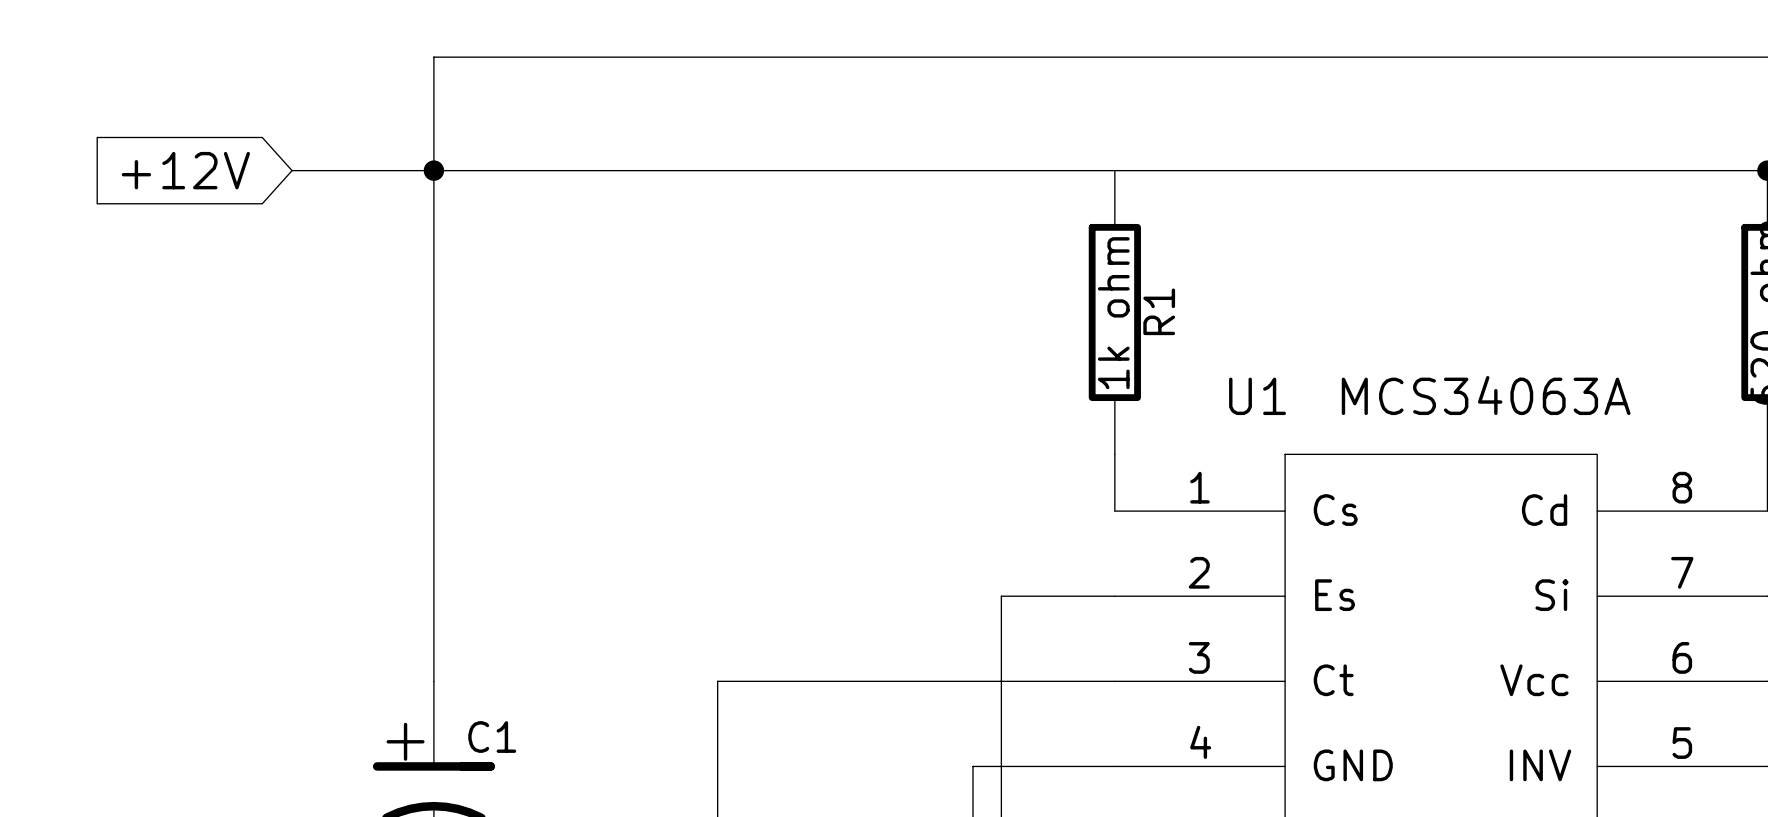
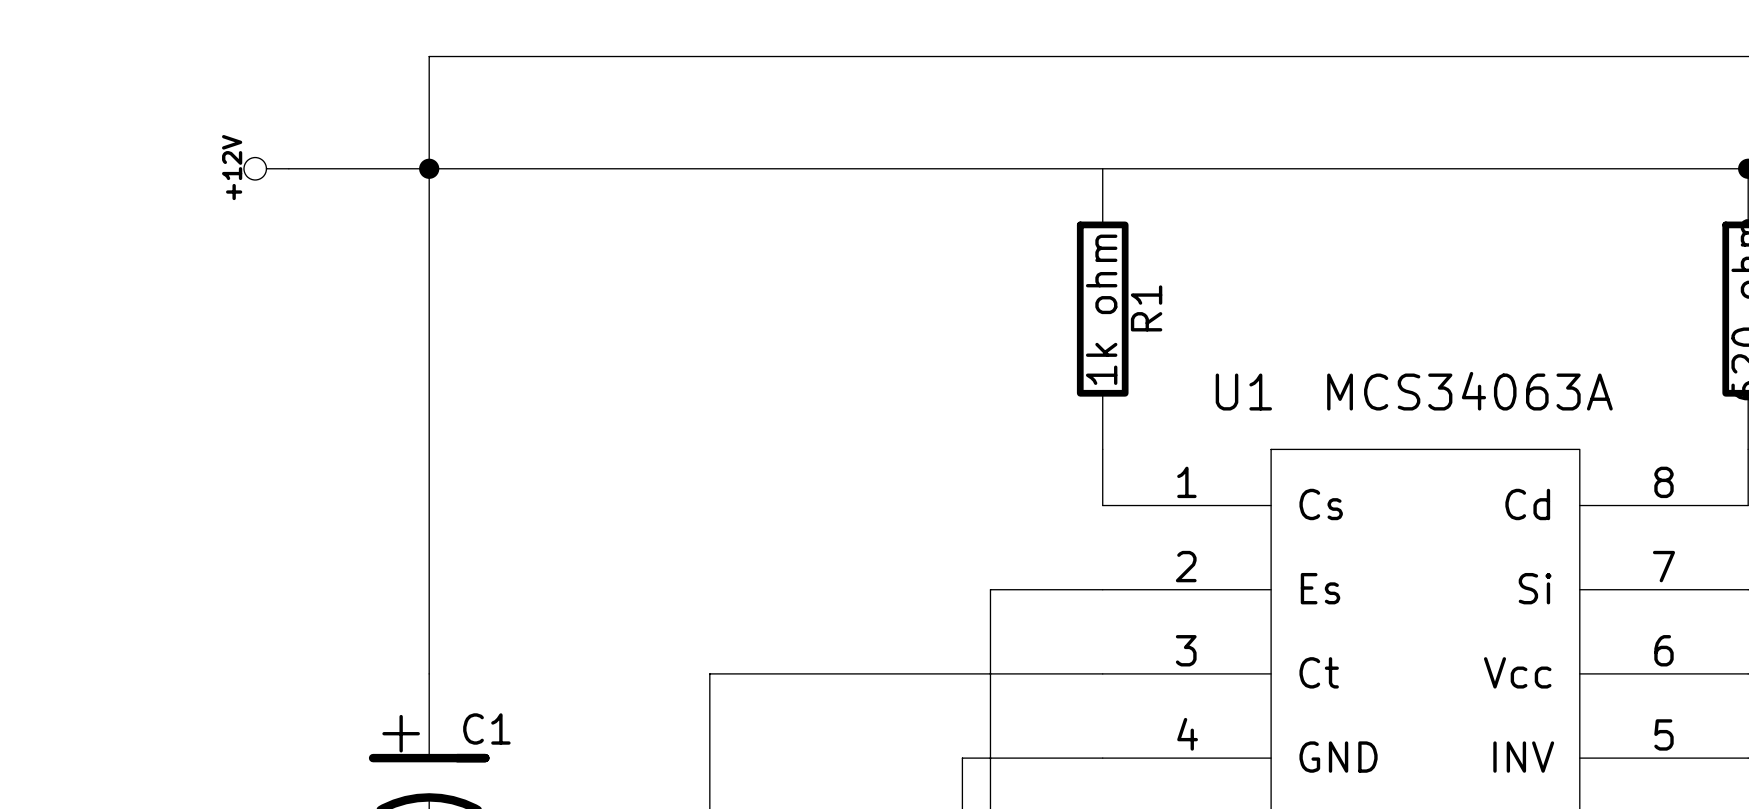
global label: +12V (185, 170) -> none
power symbol: none -> +12V (266, 168)

